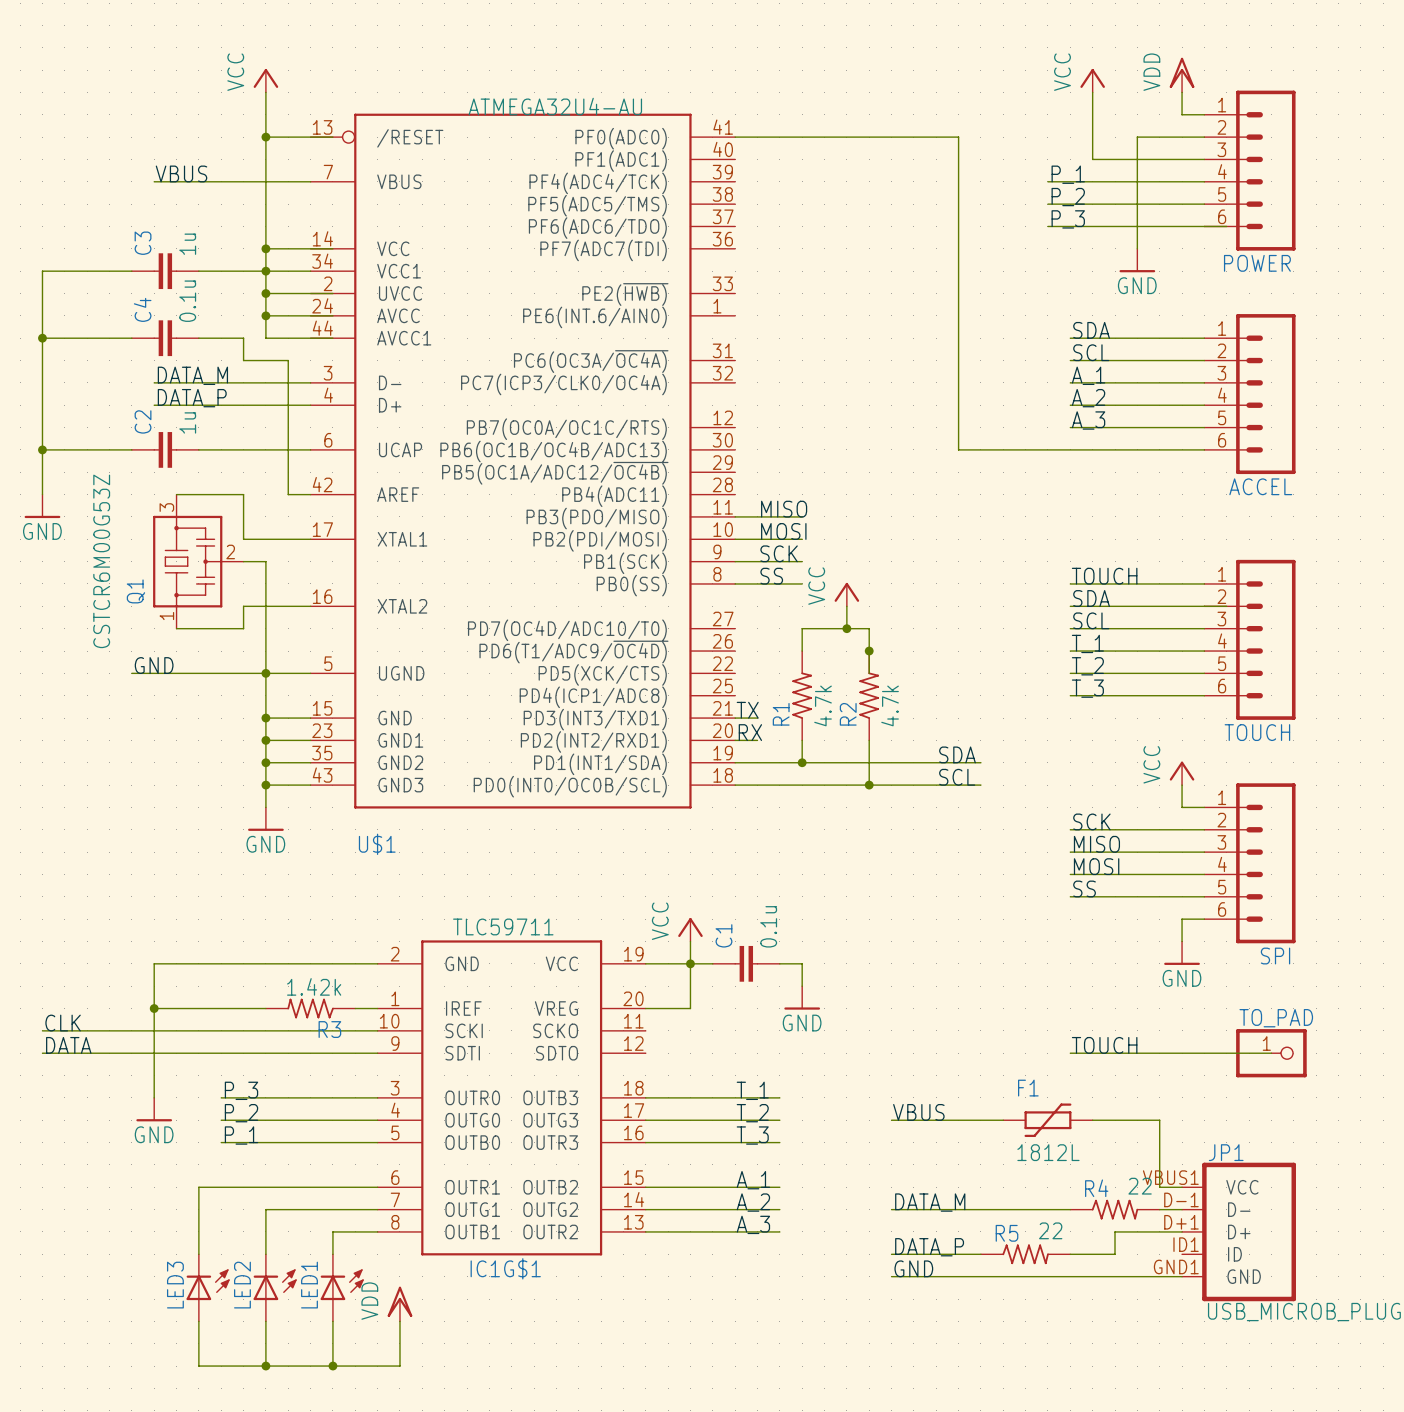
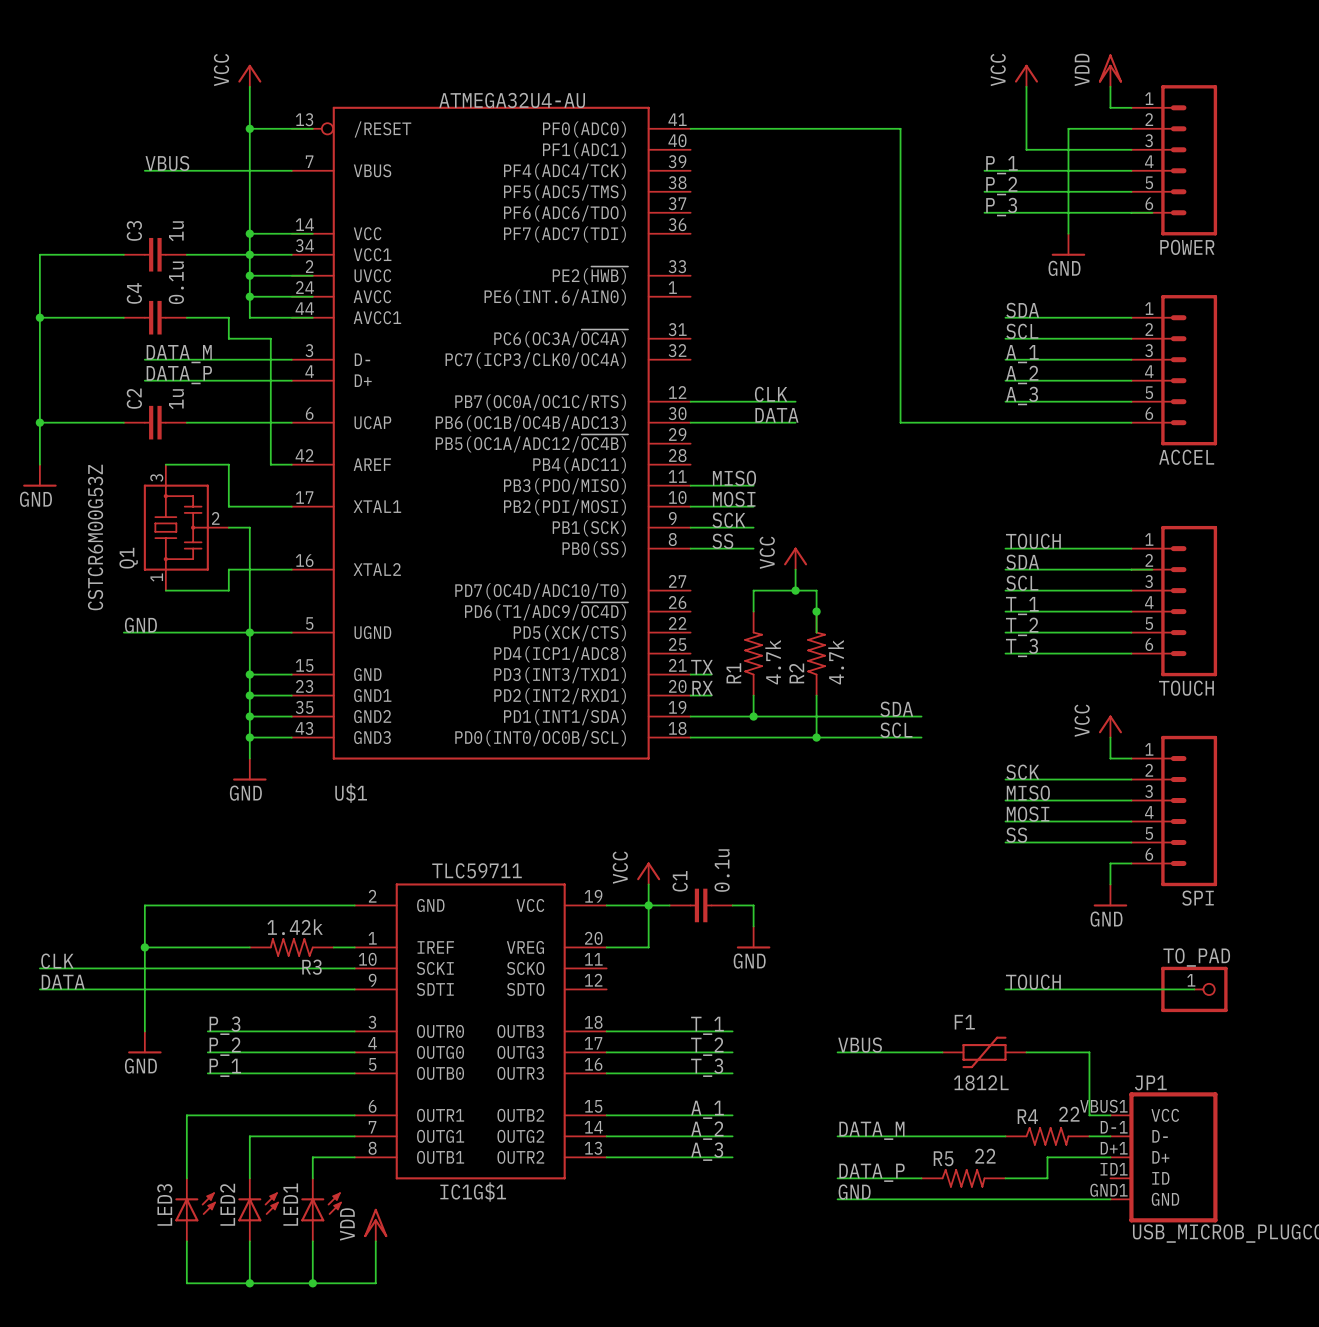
label: none -> CLK (771, 394)
wire: none -> (690, 401) (795, 401)
label: none -> DATA (776, 415)
wire: none -> (690, 422) (795, 422)

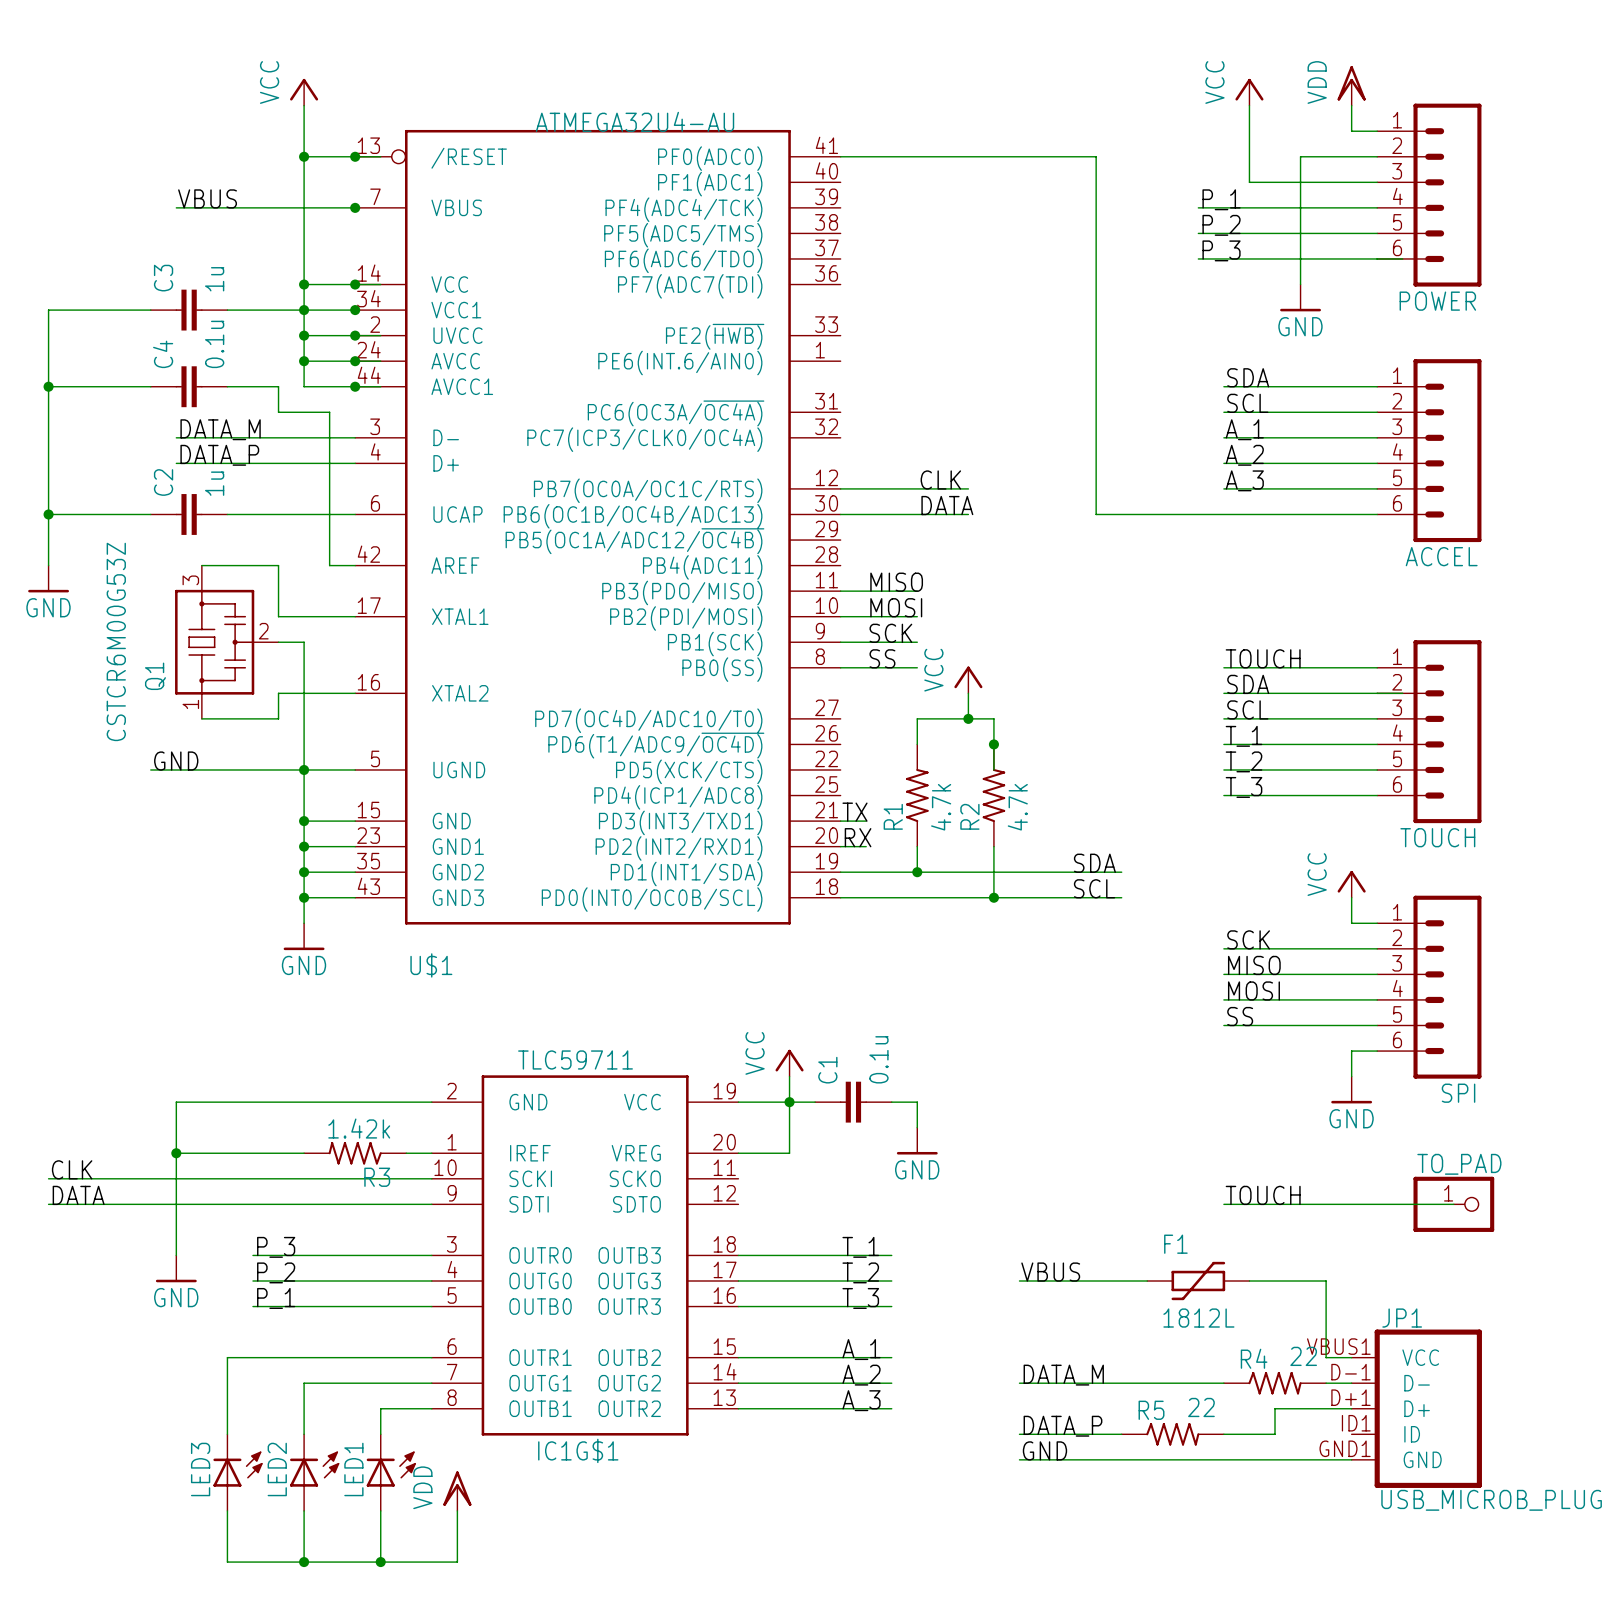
junction: none -> (355, 156)
junction: none -> (355, 207)
junction: none -> (355, 284)
junction: none -> (355, 310)
junction: none -> (355, 335)
junction: none -> (355, 361)
junction: none -> (355, 386)

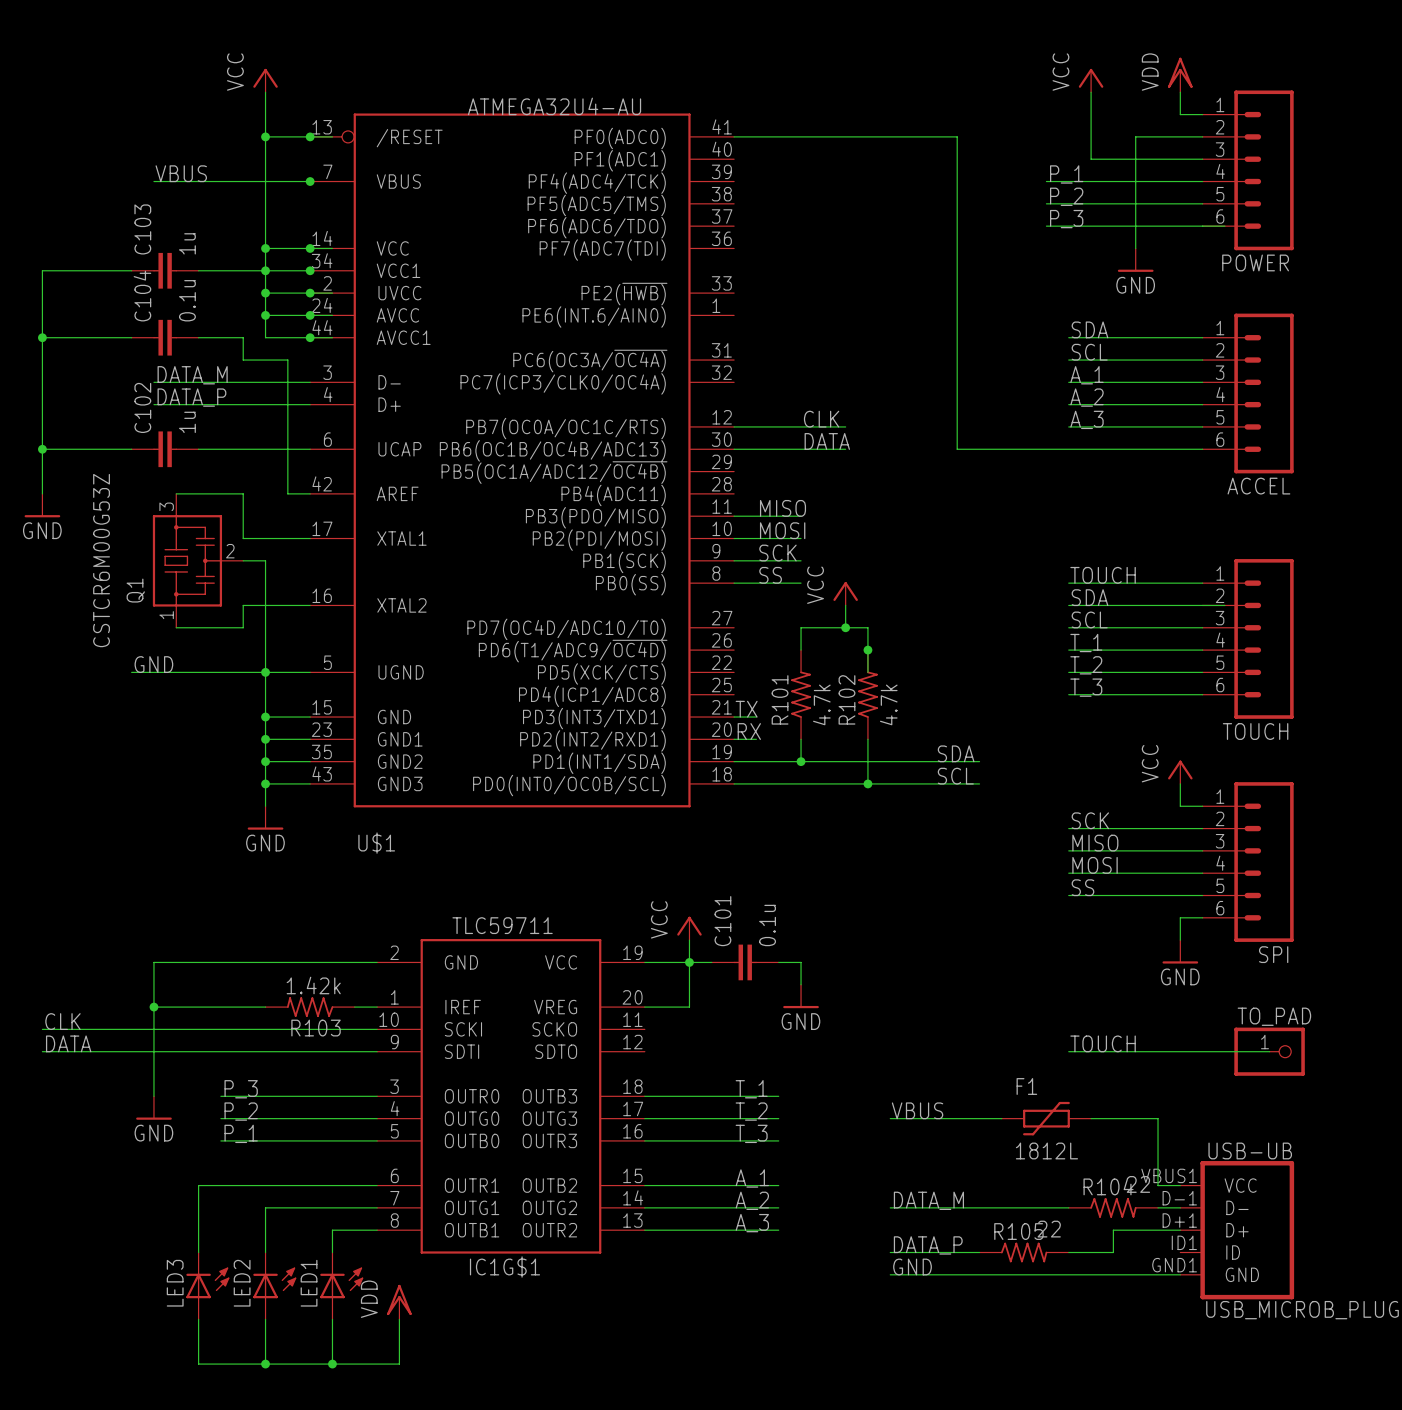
C3 name: C3 (163, 278) -> C103 (142, 229)
C4 name: C4 (163, 354) -> C104 (142, 296)
C2 name: C2 (163, 482) -> C102 (142, 407)
R1 name: R1 (893, 816) -> R101 (780, 699)
R2 name: R2 (969, 816) -> R102 (846, 699)
C1 name: C1 (827, 1070) -> C101 (722, 921)
R3 name: R3 (377, 1177) -> R103 (316, 1028)
JP1 name: JP1 (1402, 1318) -> USB-UB (1250, 1150)
R4 name: R4 (1254, 1358) -> R104 (1108, 1186)
R5 name: R5 (1151, 1410) -> R105 (1018, 1231)

